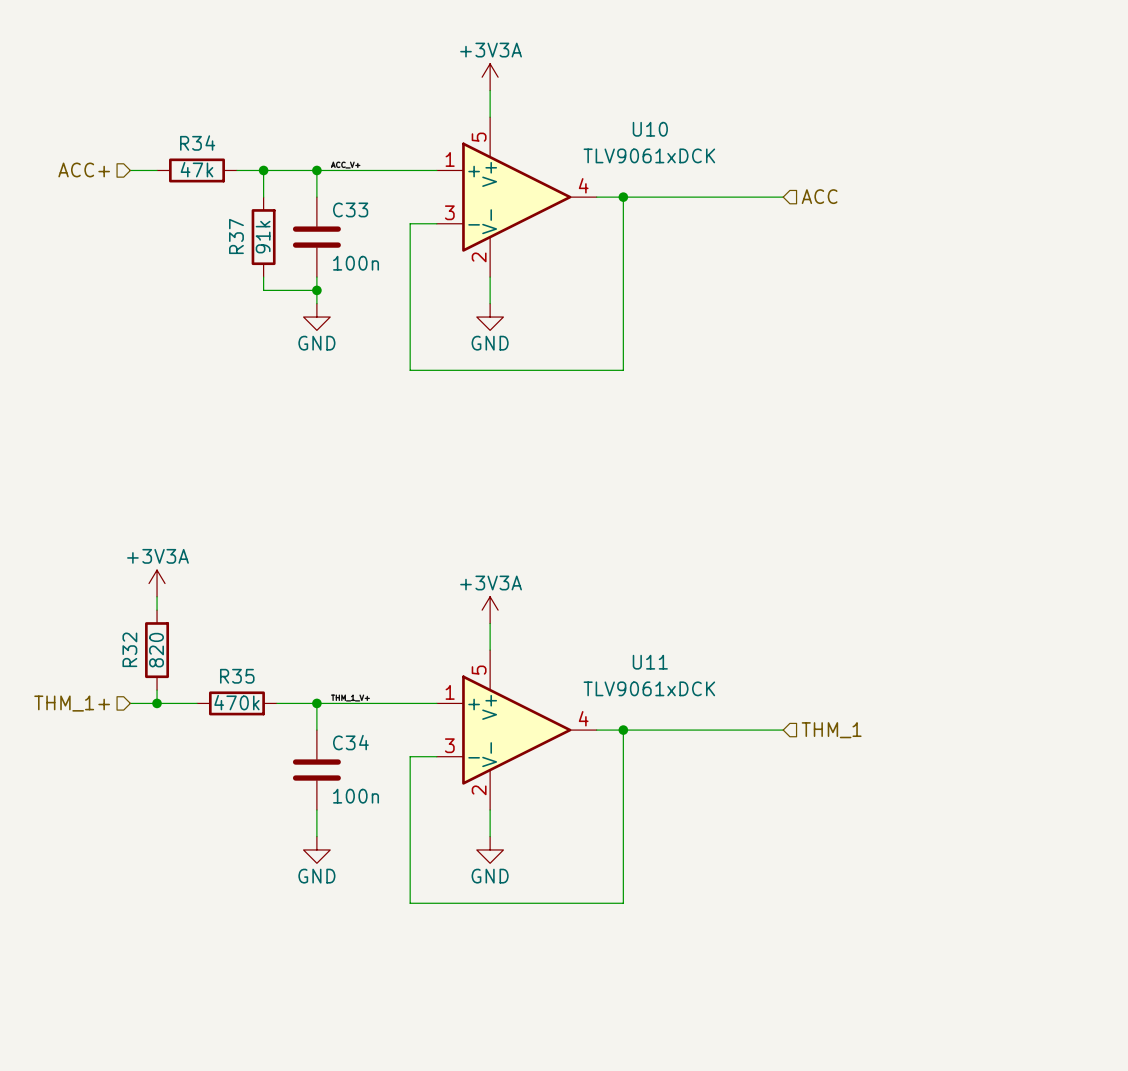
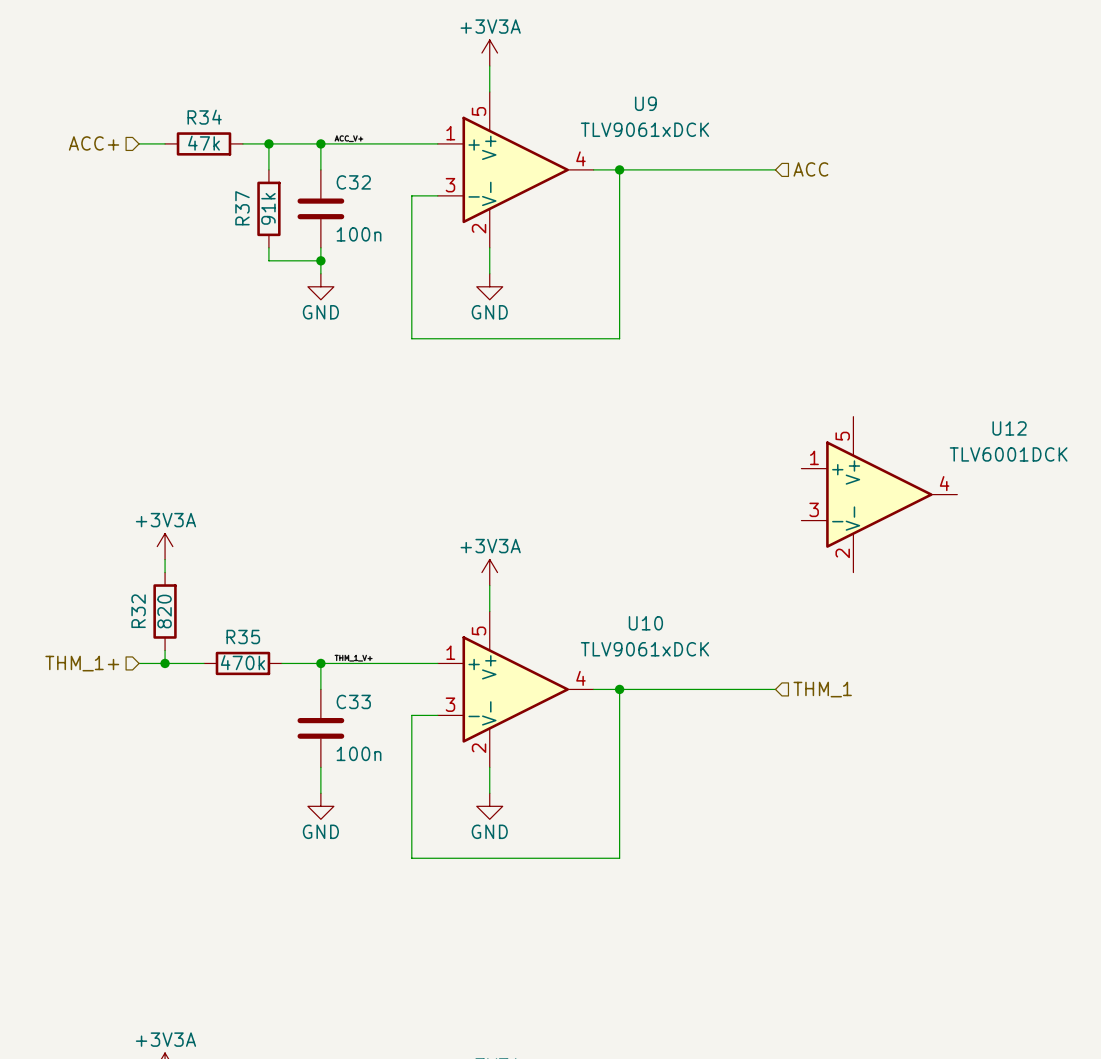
U10 name: U10 (650, 129) -> U9 (645, 103)
C33 name: C33 (350, 209) -> C32 (353, 182)
U12: none -> TLV6001DCK (879, 494)
U11 name: U11 (650, 662) -> U10 (645, 623)
C34 name: C34 (350, 742) -> C33 (353, 701)

